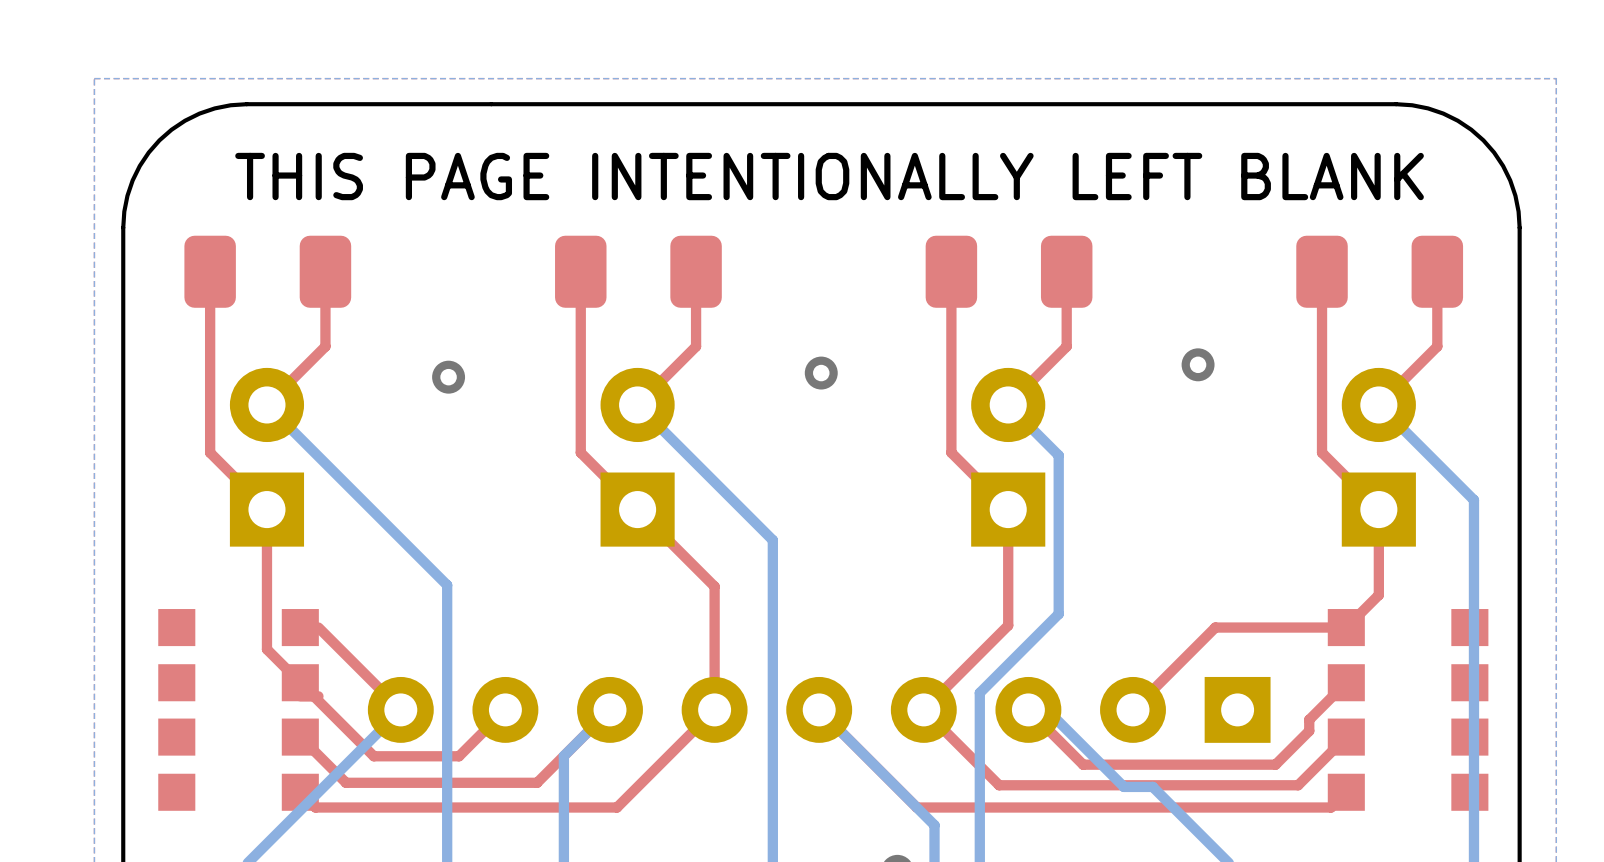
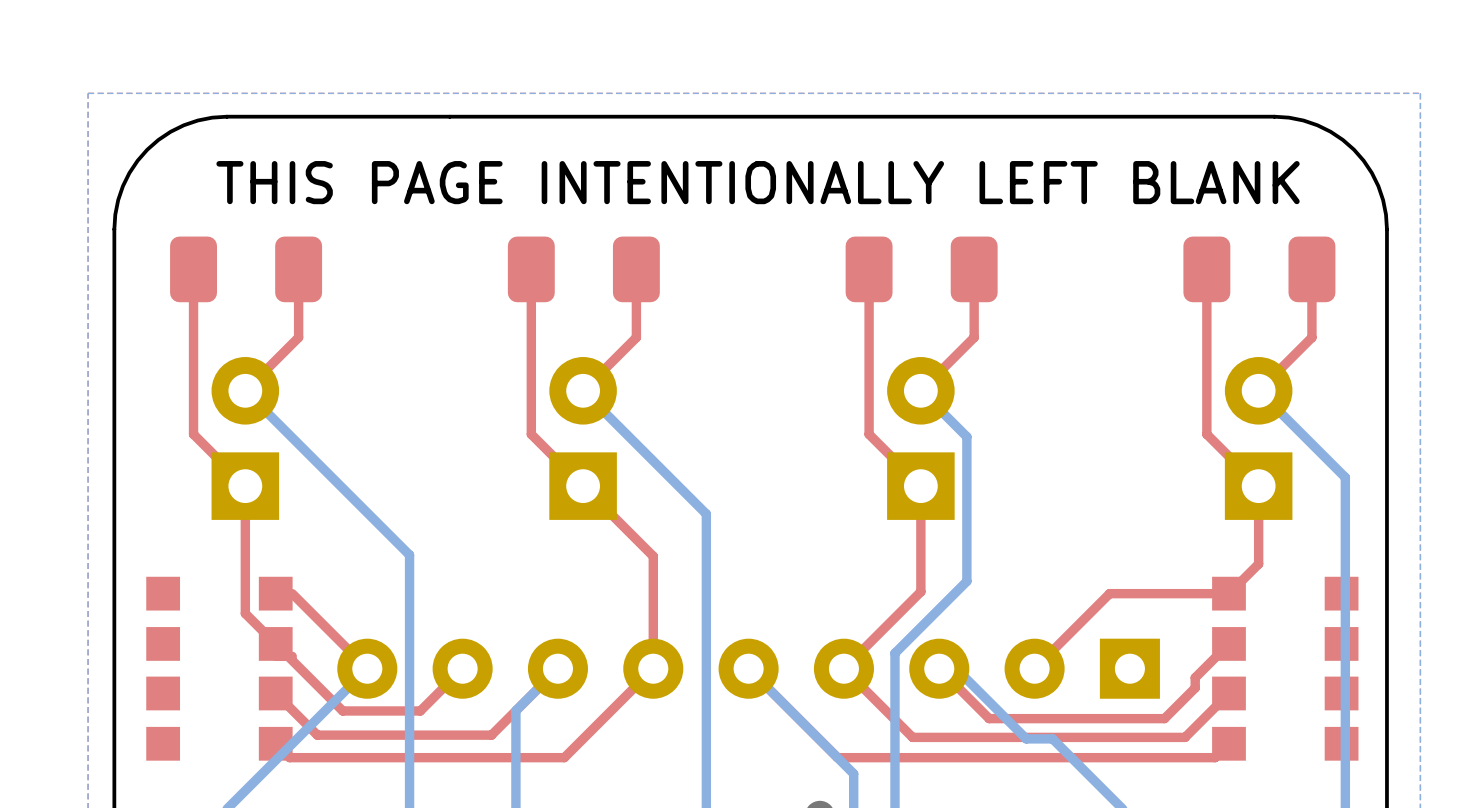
via: (1198, 364) -> none
via: (821, 373) -> none
via: (448, 377) -> none

